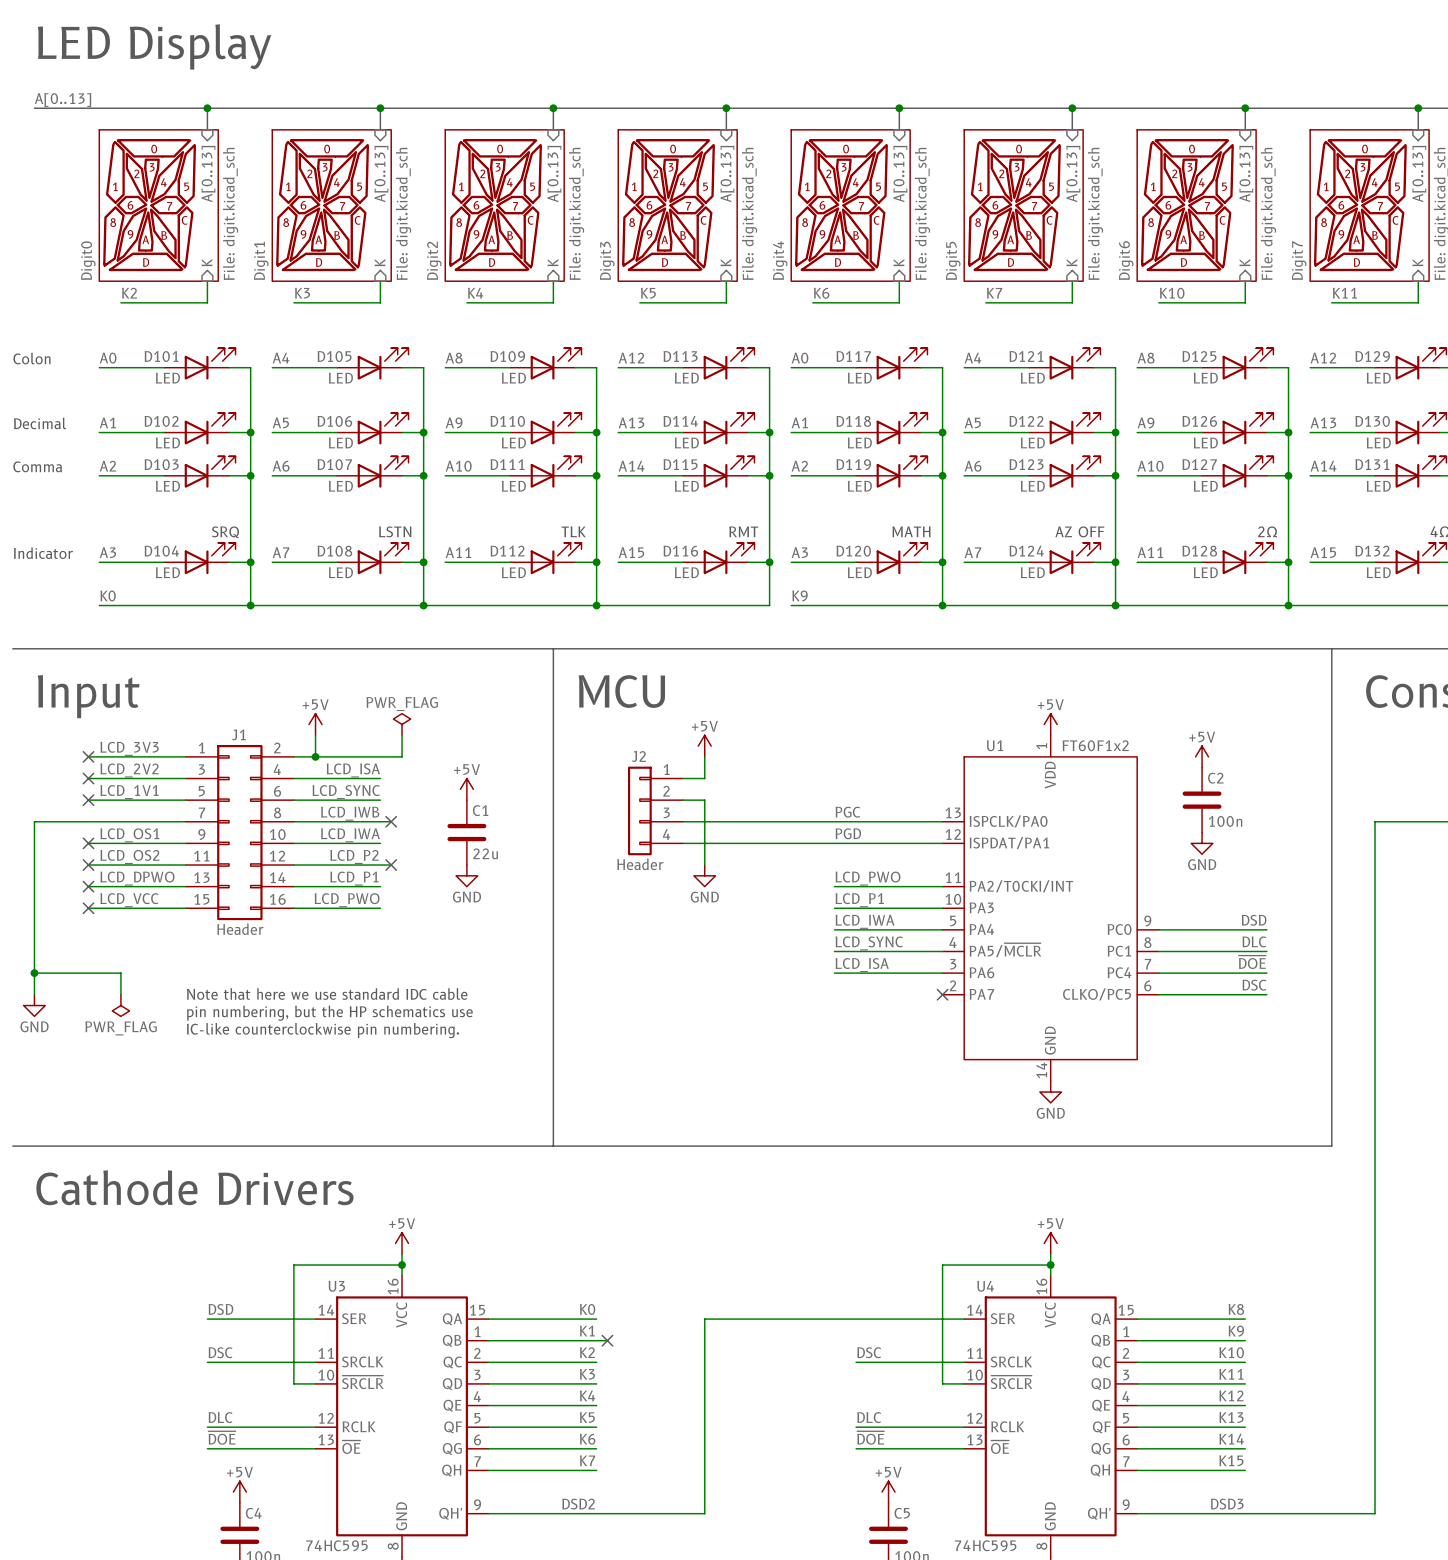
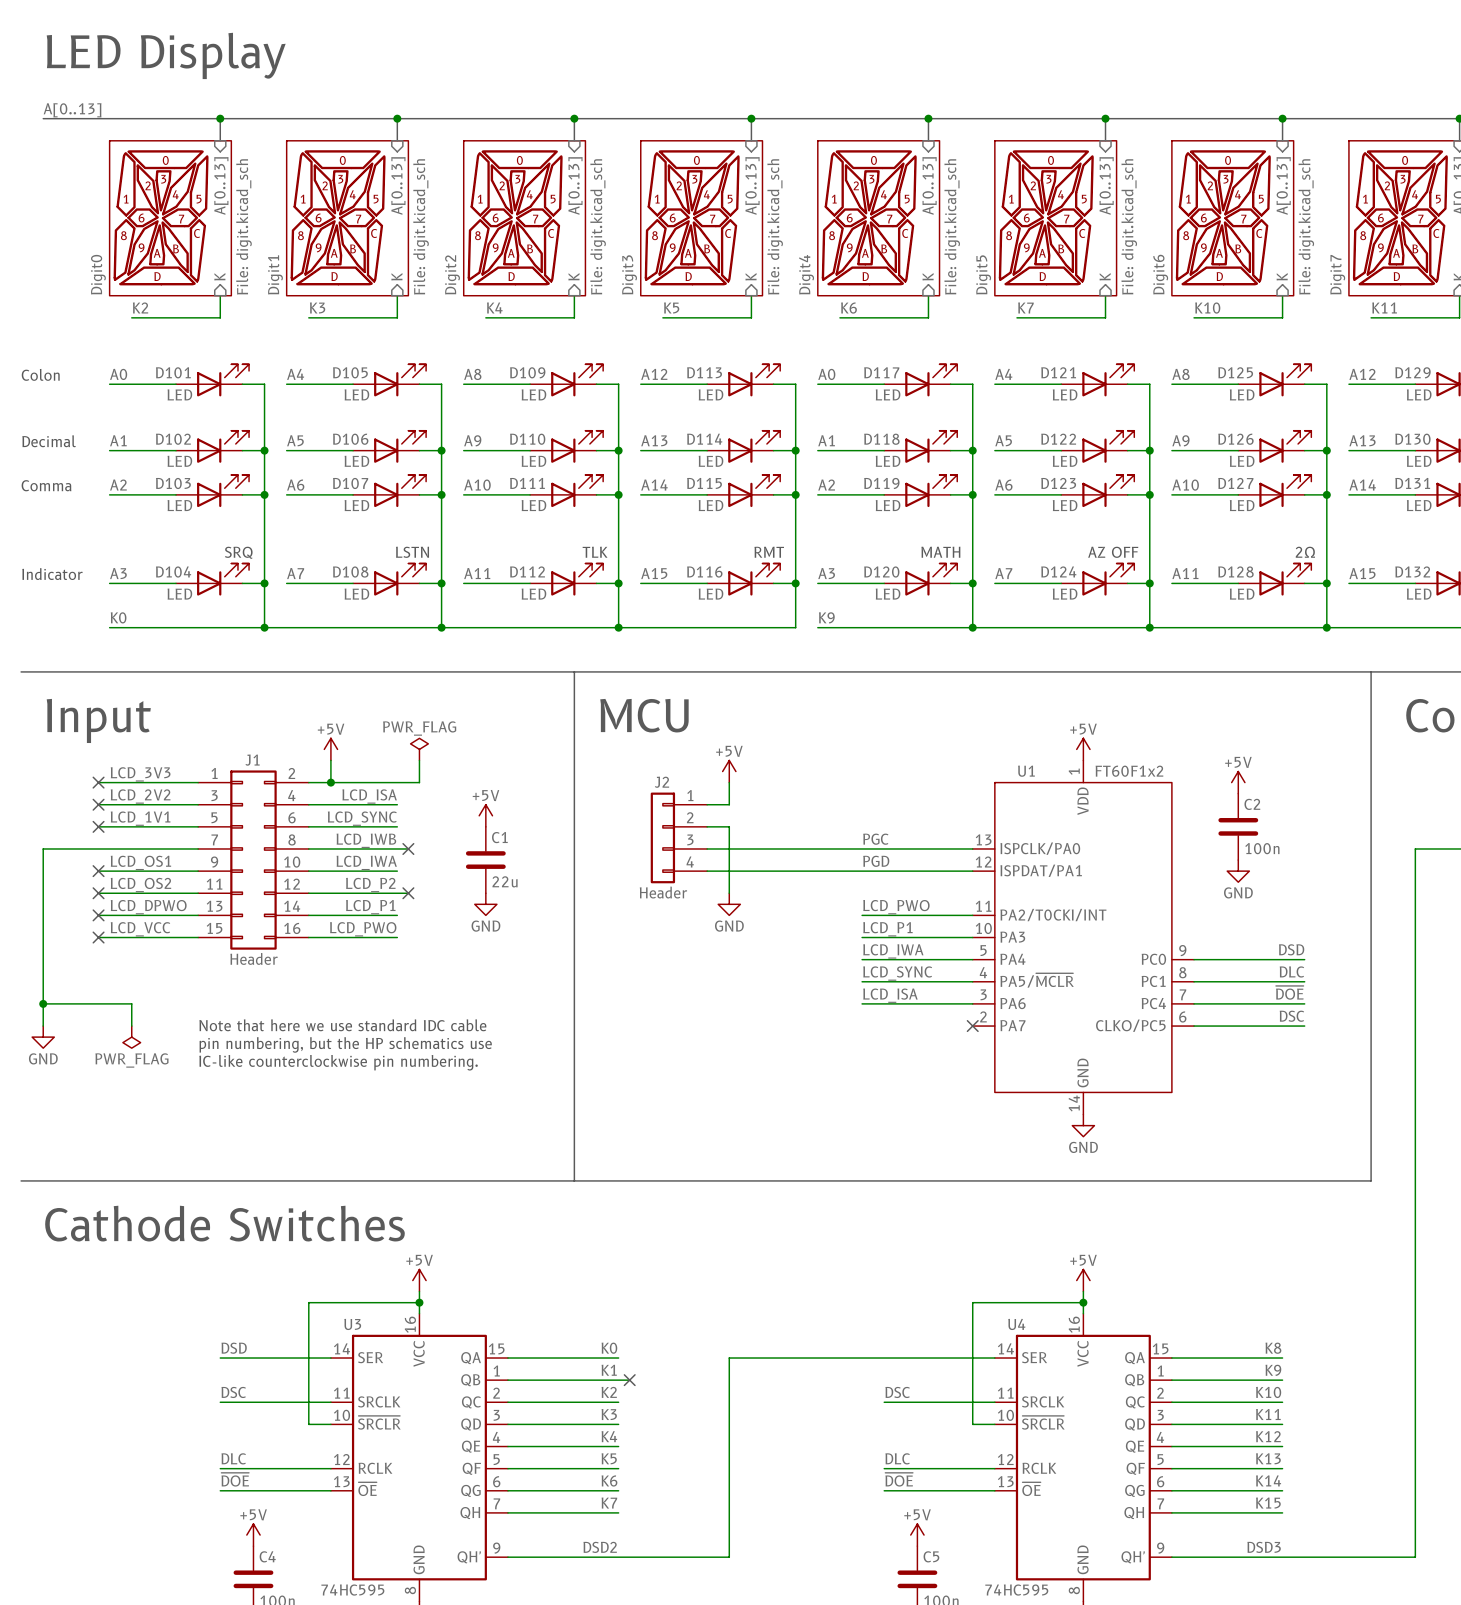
text: Cathode Drivers (194, 1187) -> Cathode Switches (224, 1223)

